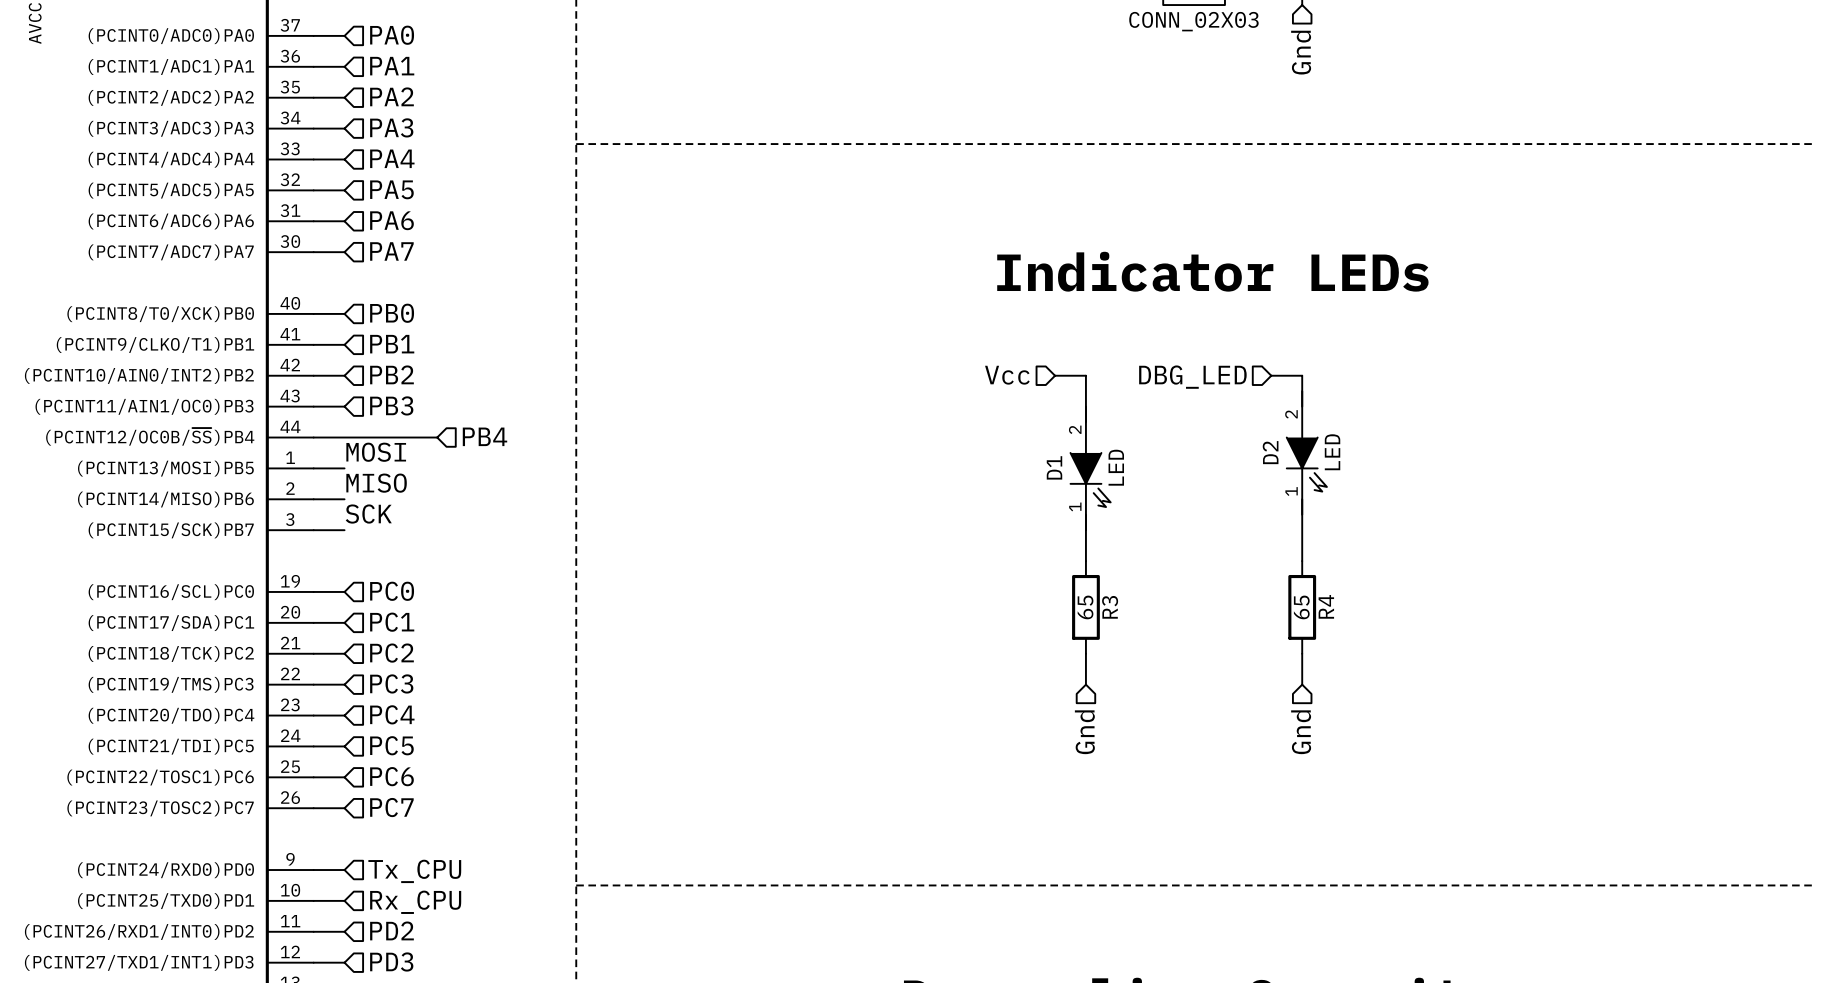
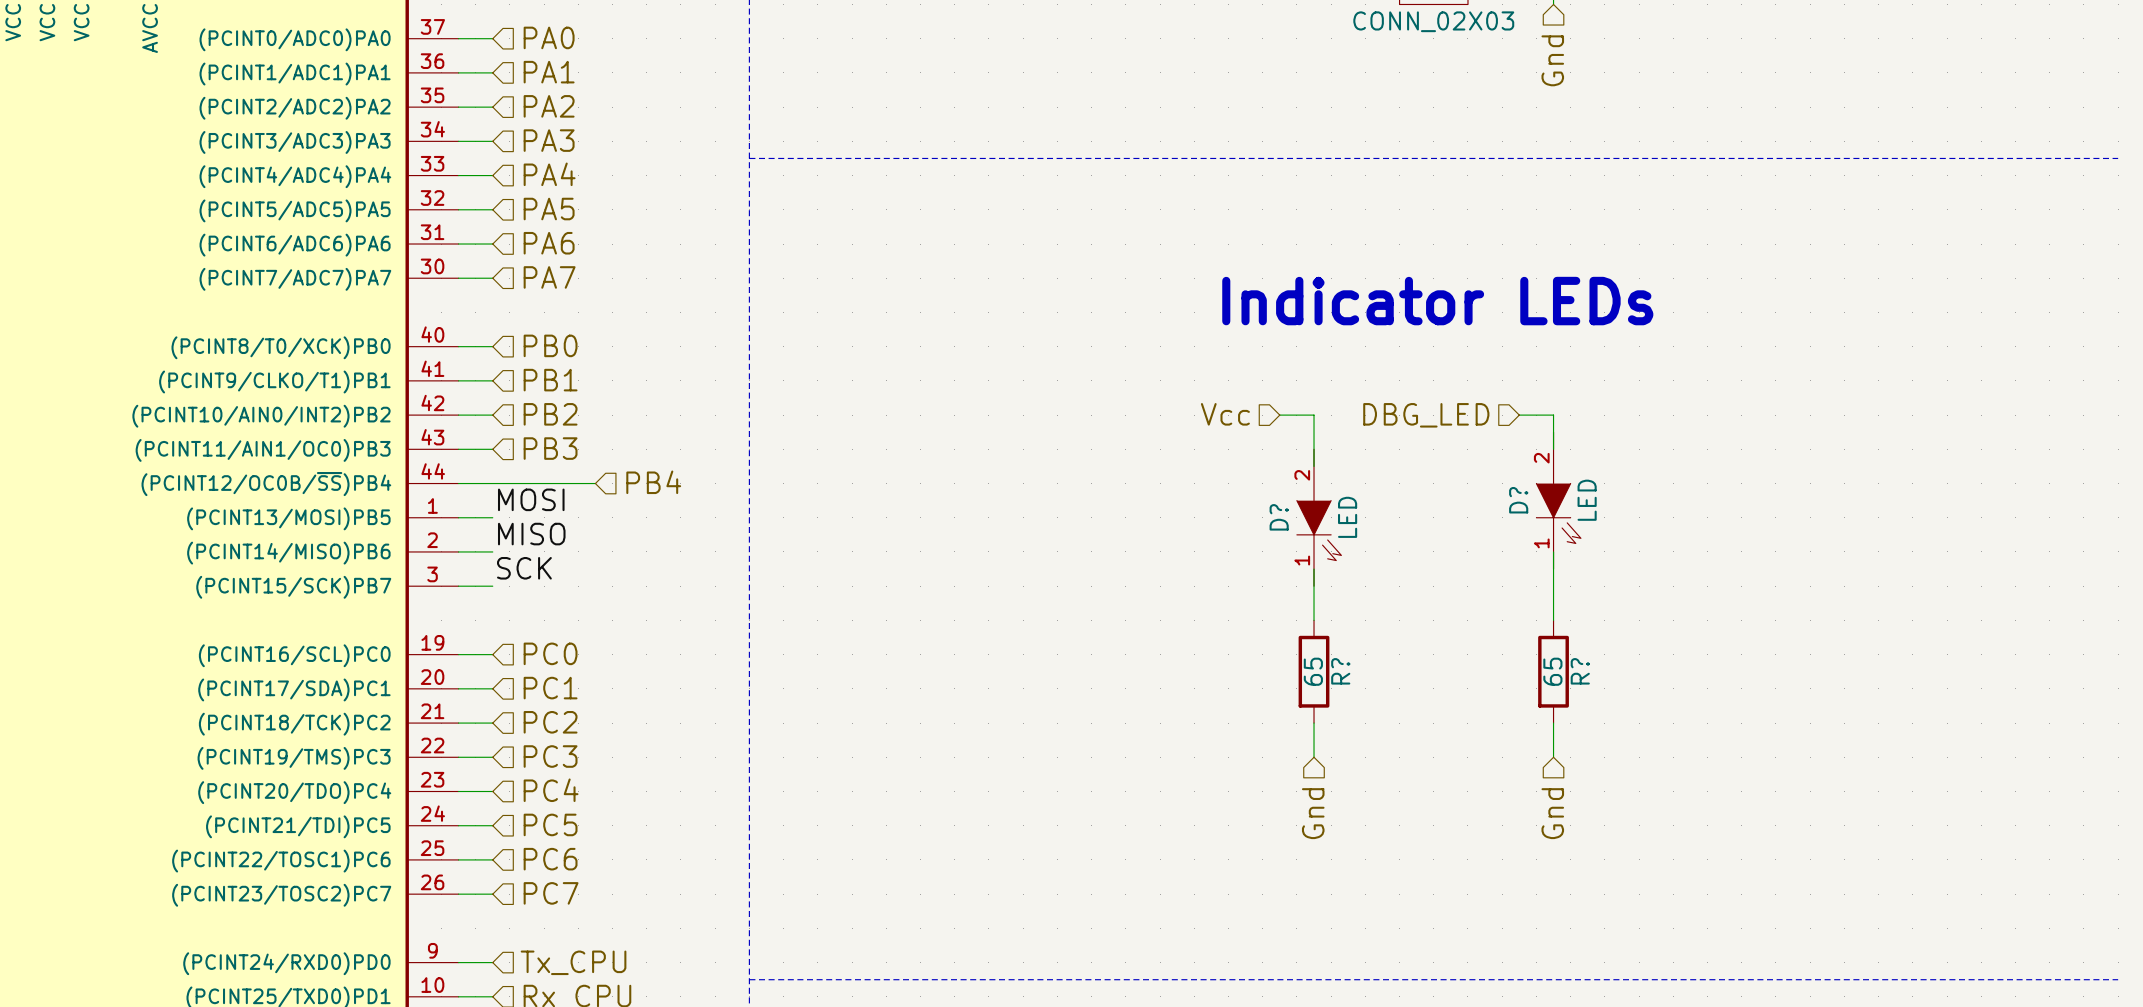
D2 name: D2 (1270, 452) -> D? (1518, 500)
D1 name: D1 (1054, 467) -> D? (1279, 517)
R4 name: R4 (1326, 606) -> R? (1580, 671)
R3 name: R3 (1110, 607) -> R? (1340, 671)

